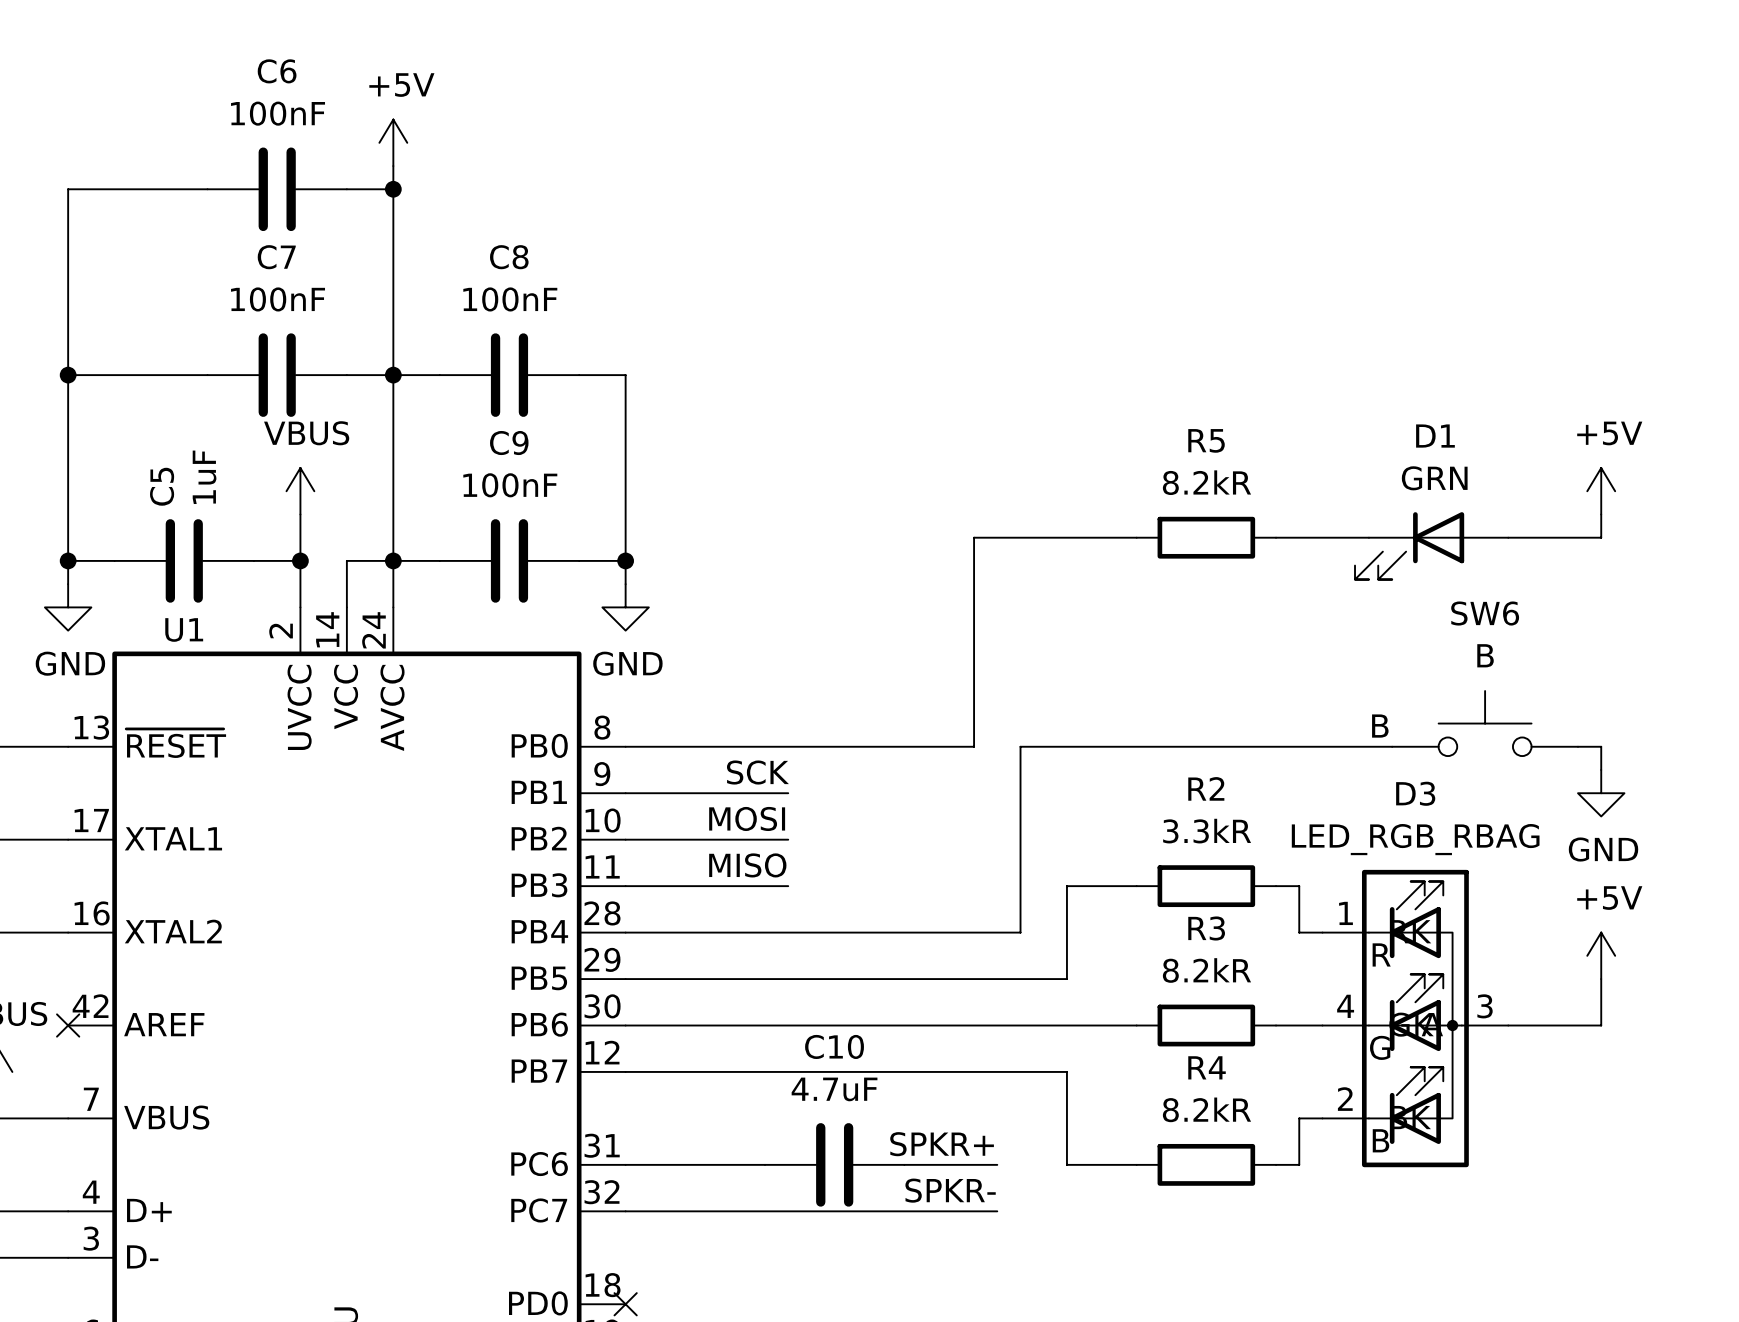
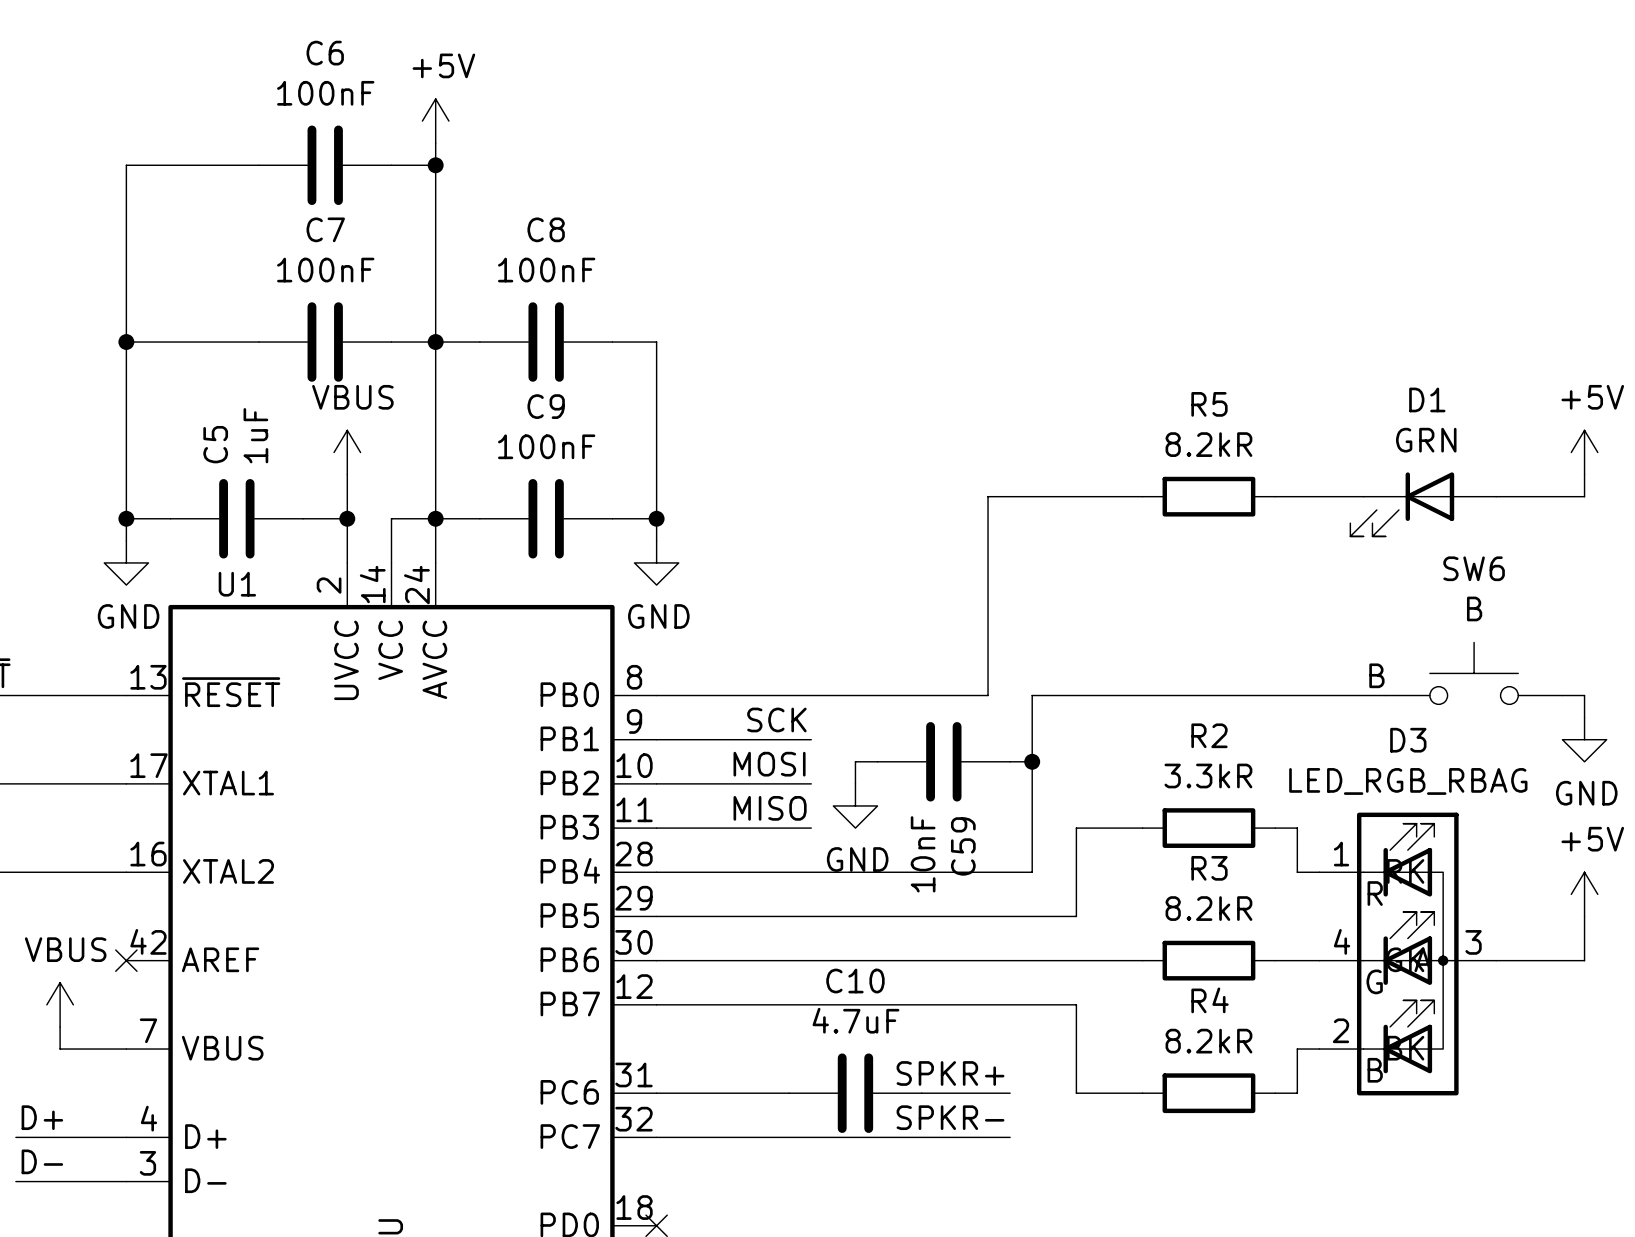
wire: none -> (877, 761) (855, 761) (855, 783)
C59: none -> 10nF (943, 761)
wire: none -> (1010, 761) (1032, 761)
junction: none -> (1032, 761)
power symbol: none -> GND (855, 805)

